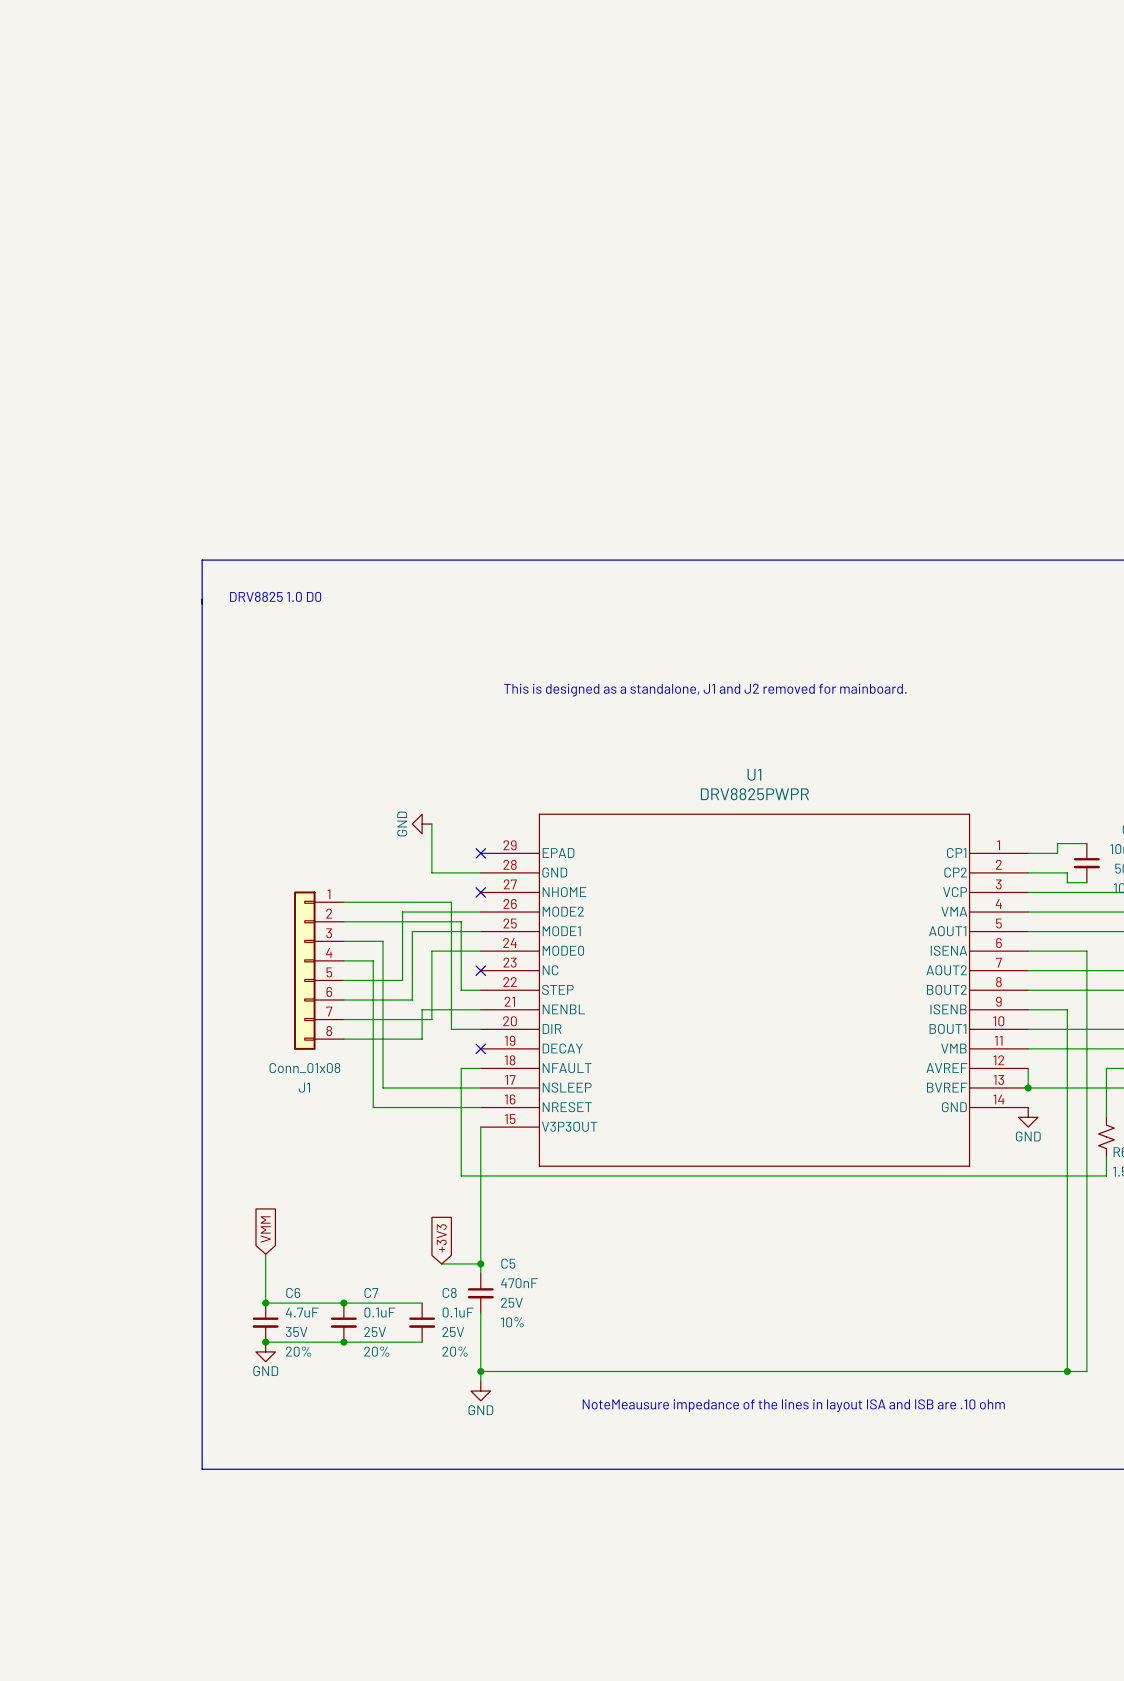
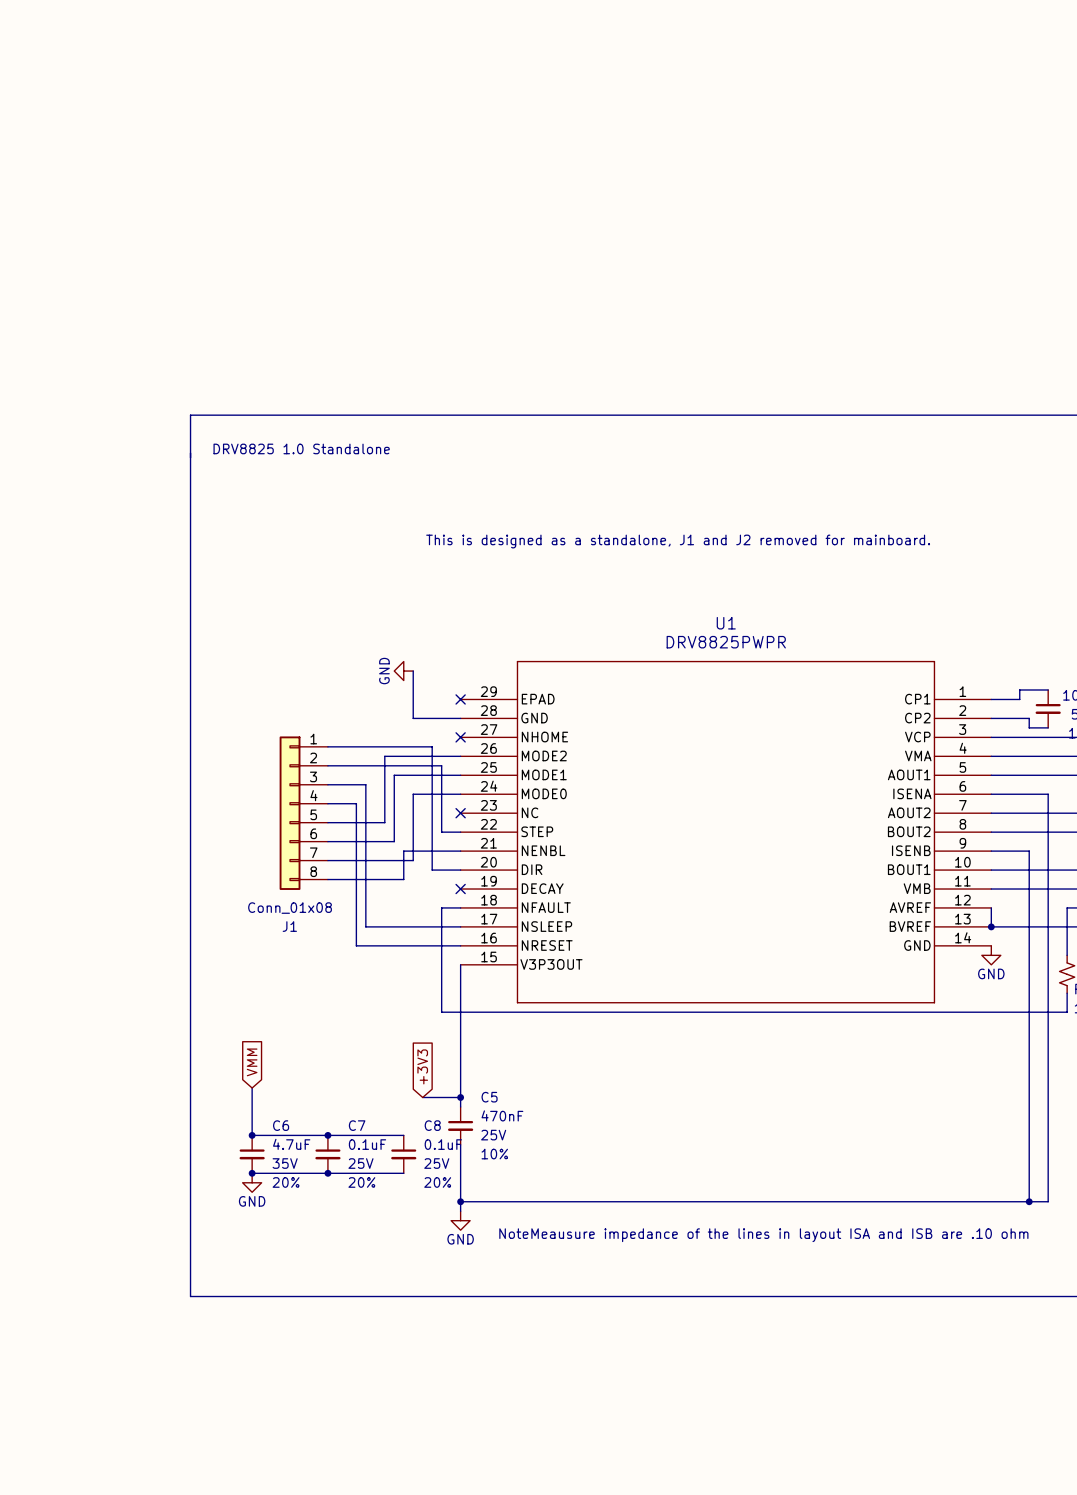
text: DRV8825 1.0 D0 (275, 596) -> DRV8825 1.0 Standalone (301, 448)

